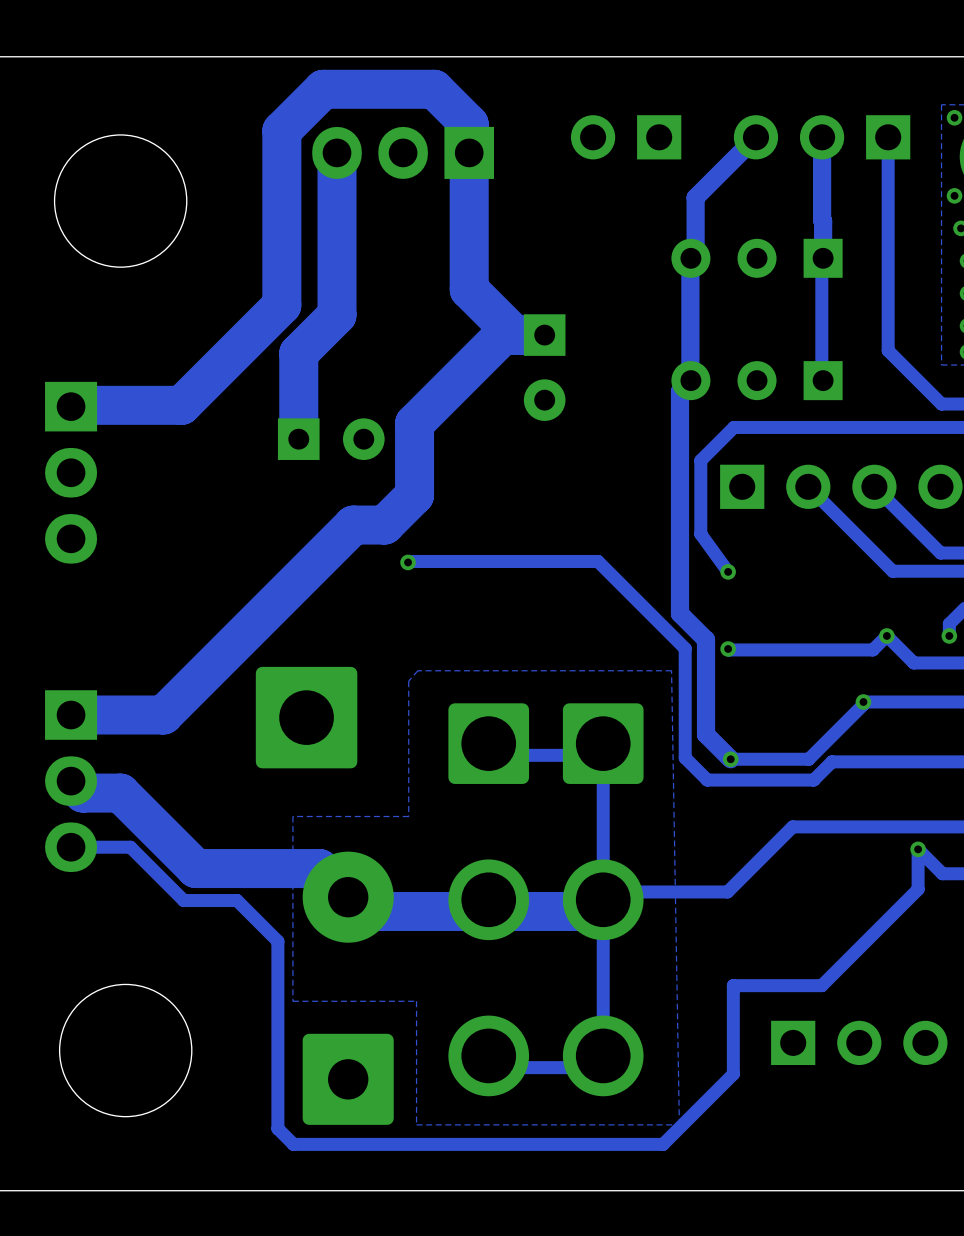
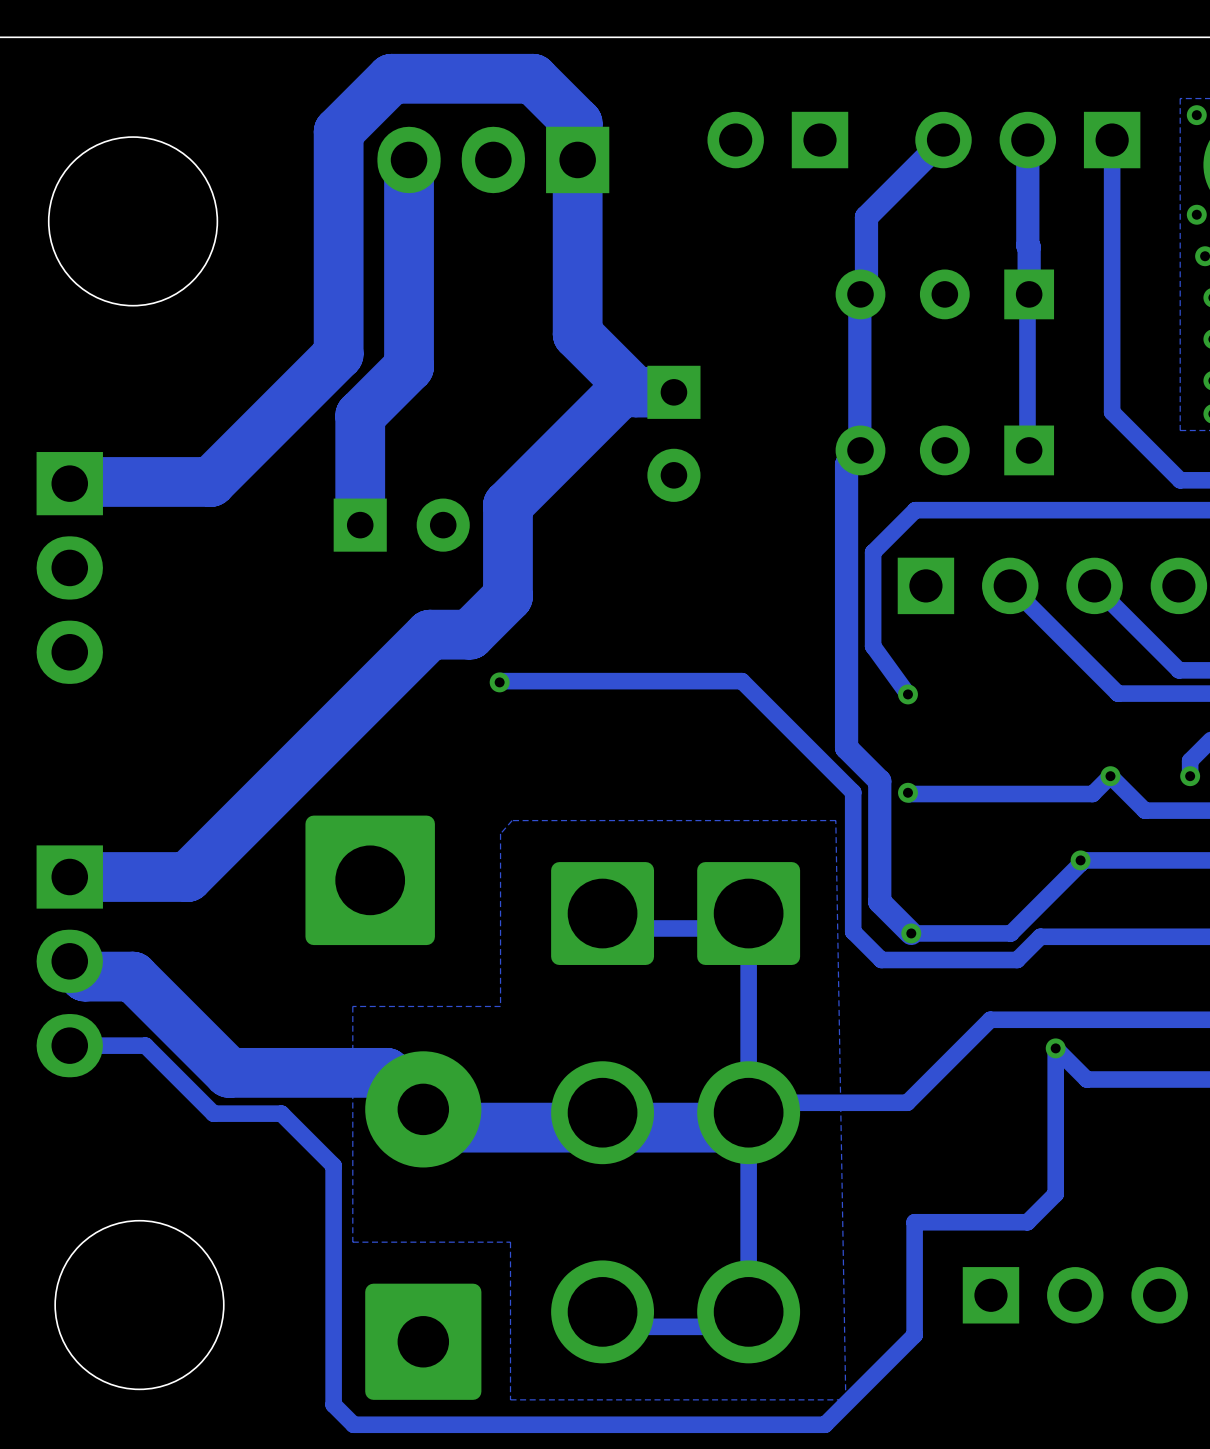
via: none -> (1055, 1048)
via: (918, 849) -> none
track: (942, 873) (918, 849) (918, 889) (843, 963) -> (1181, 1079) (1086, 1079) (1055, 1048) (1055, 1194)

